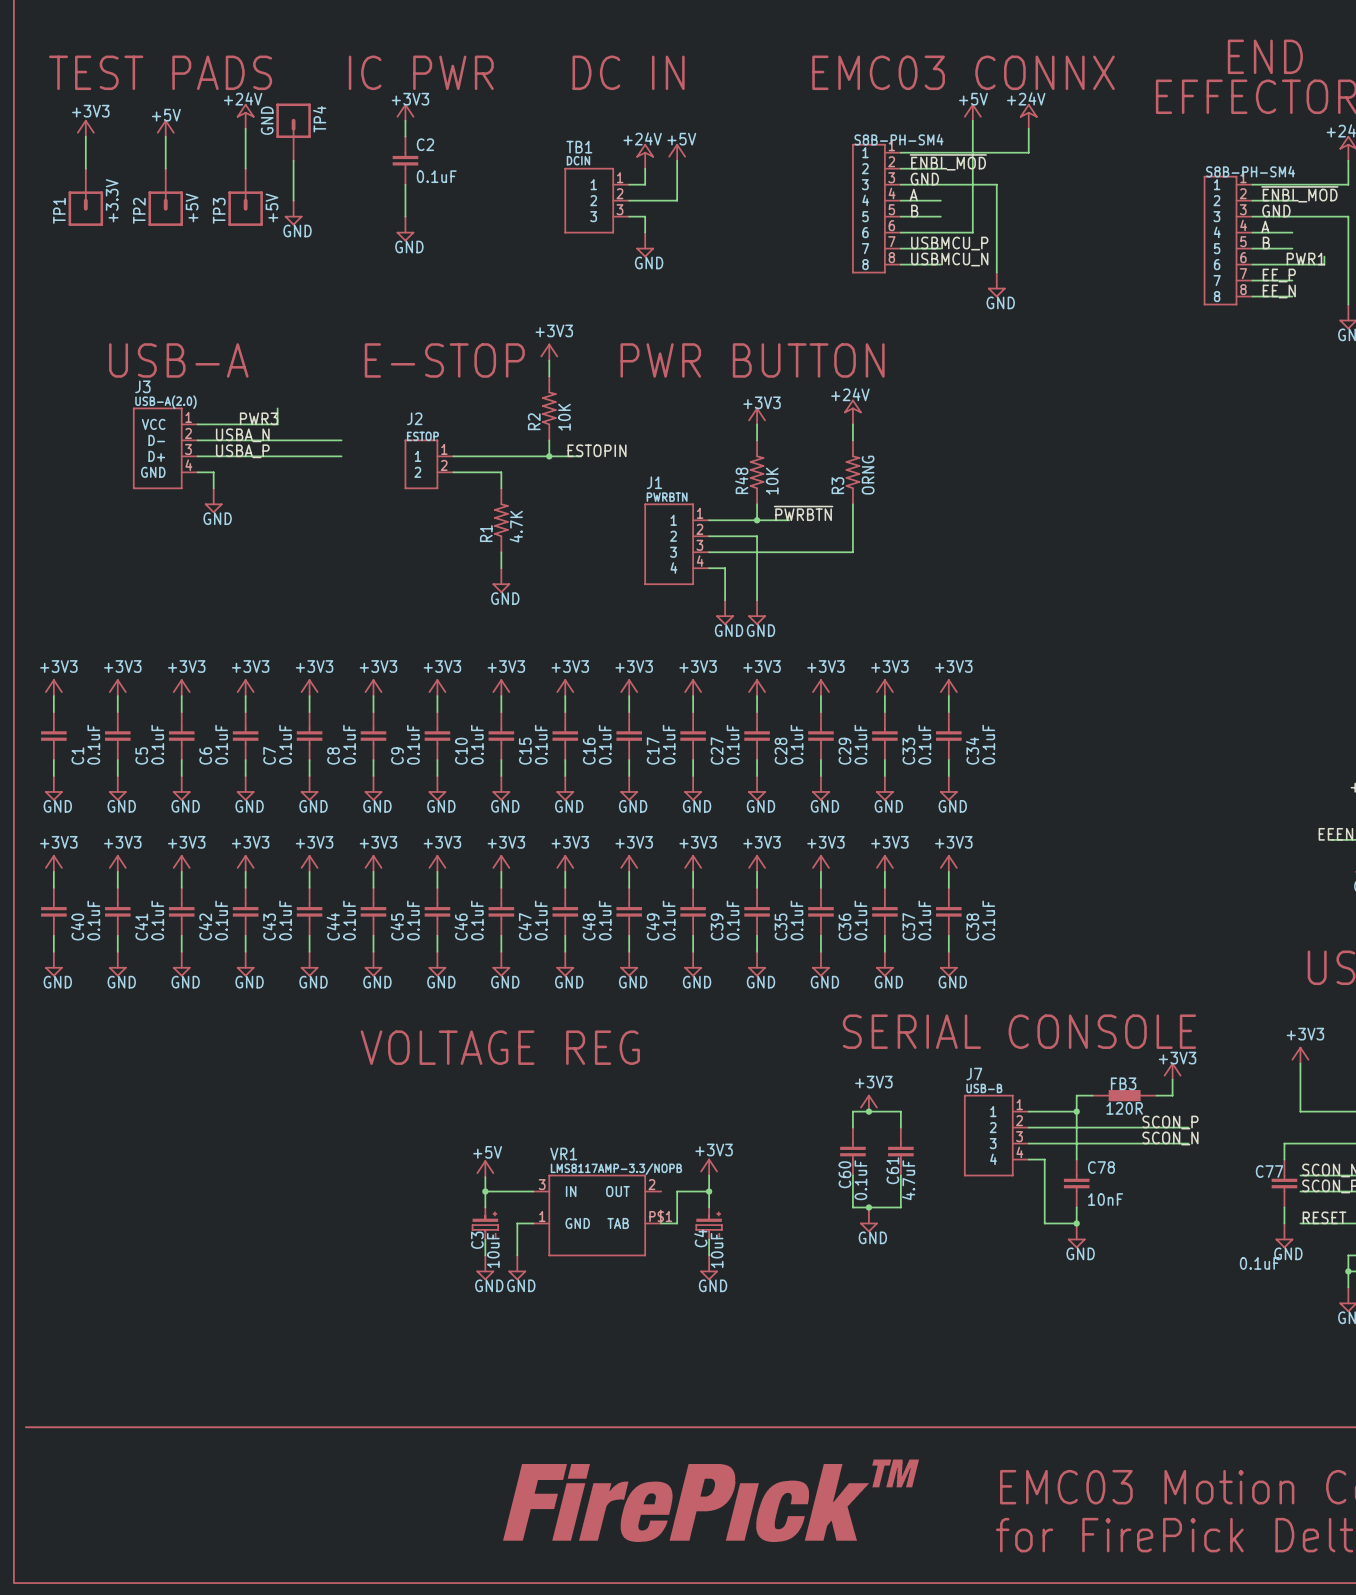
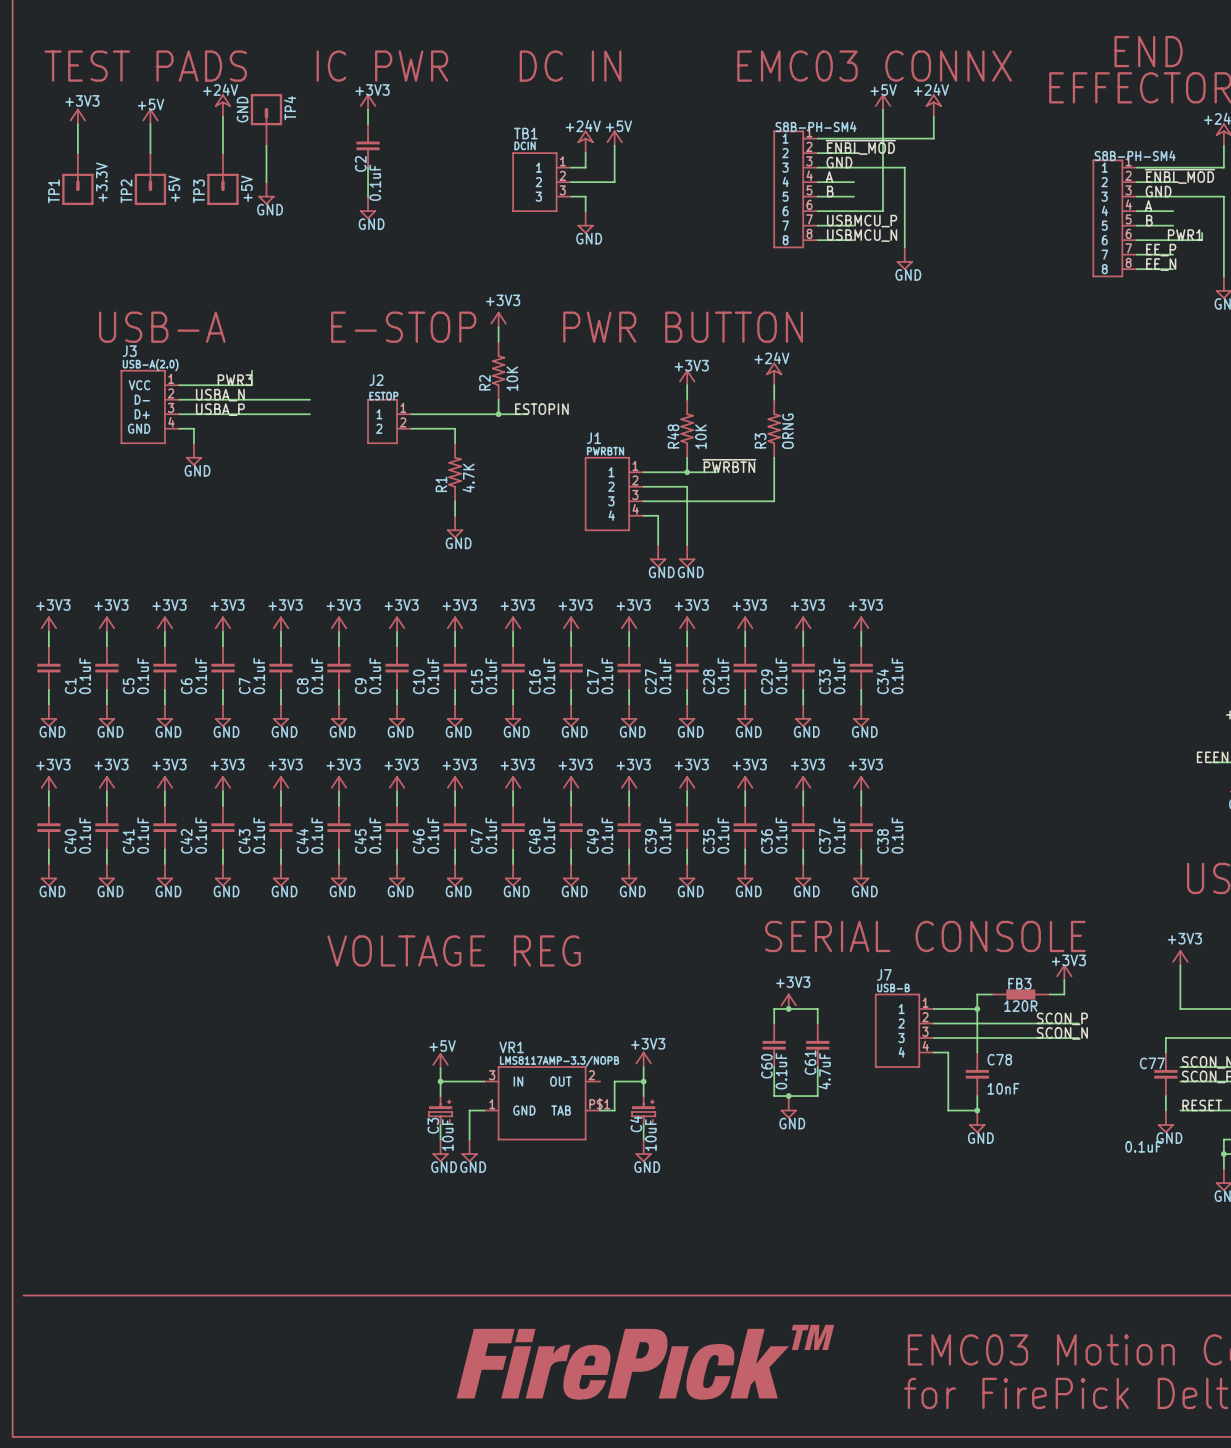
C2 name rotation: 0° (425, 144) -> 90° counterclockwise (360, 163)
C2 name position: C2 (425, 144) -> C2 (360, 163)
C2 value rotation: 0° (436, 176) -> 90° counterclockwise (375, 182)

